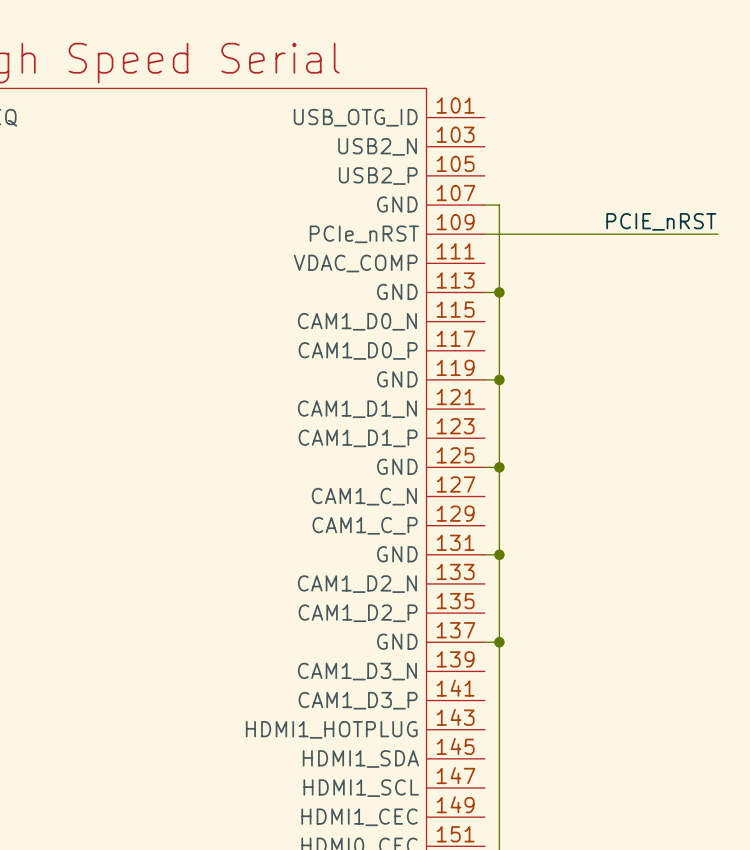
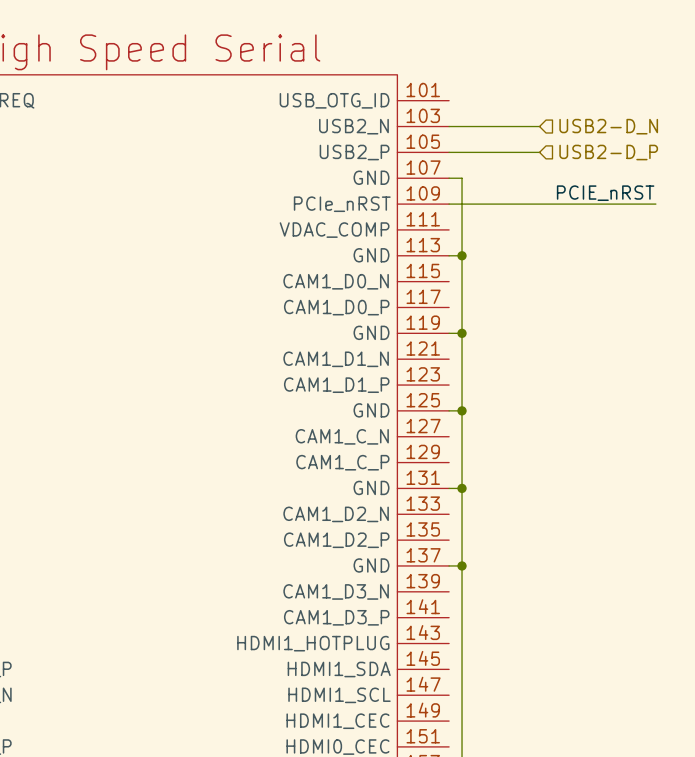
wire: none -> (449, 126) (539, 126)
hierarchical label: none -> USB2-D_N (608, 126)
wire: none -> (449, 152) (539, 152)
hierarchical label: none -> USB2-D_P (608, 152)

